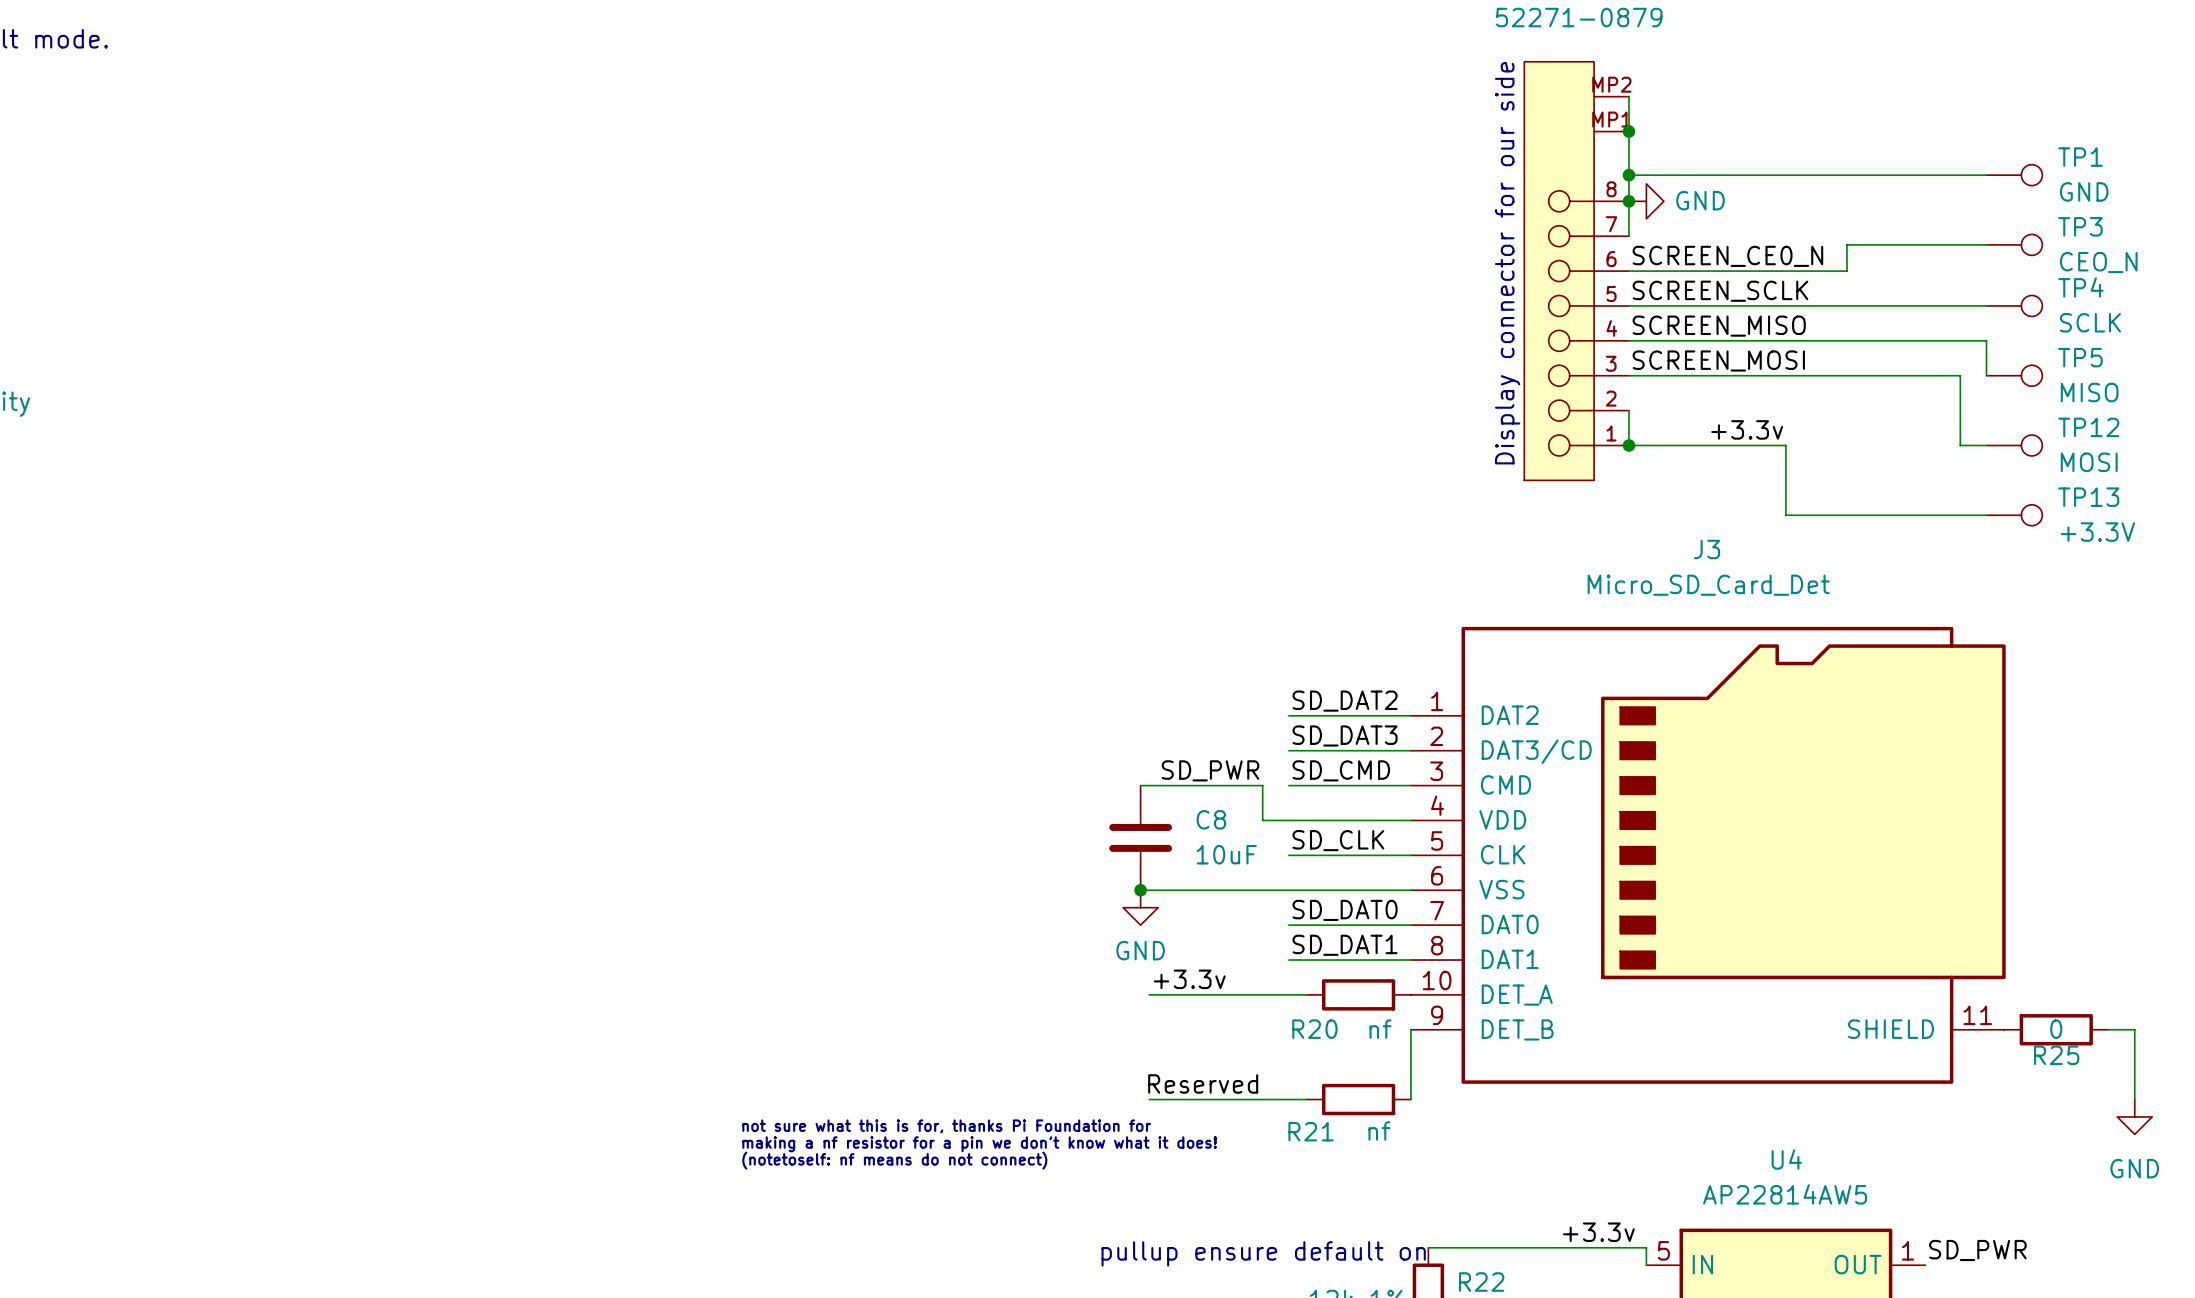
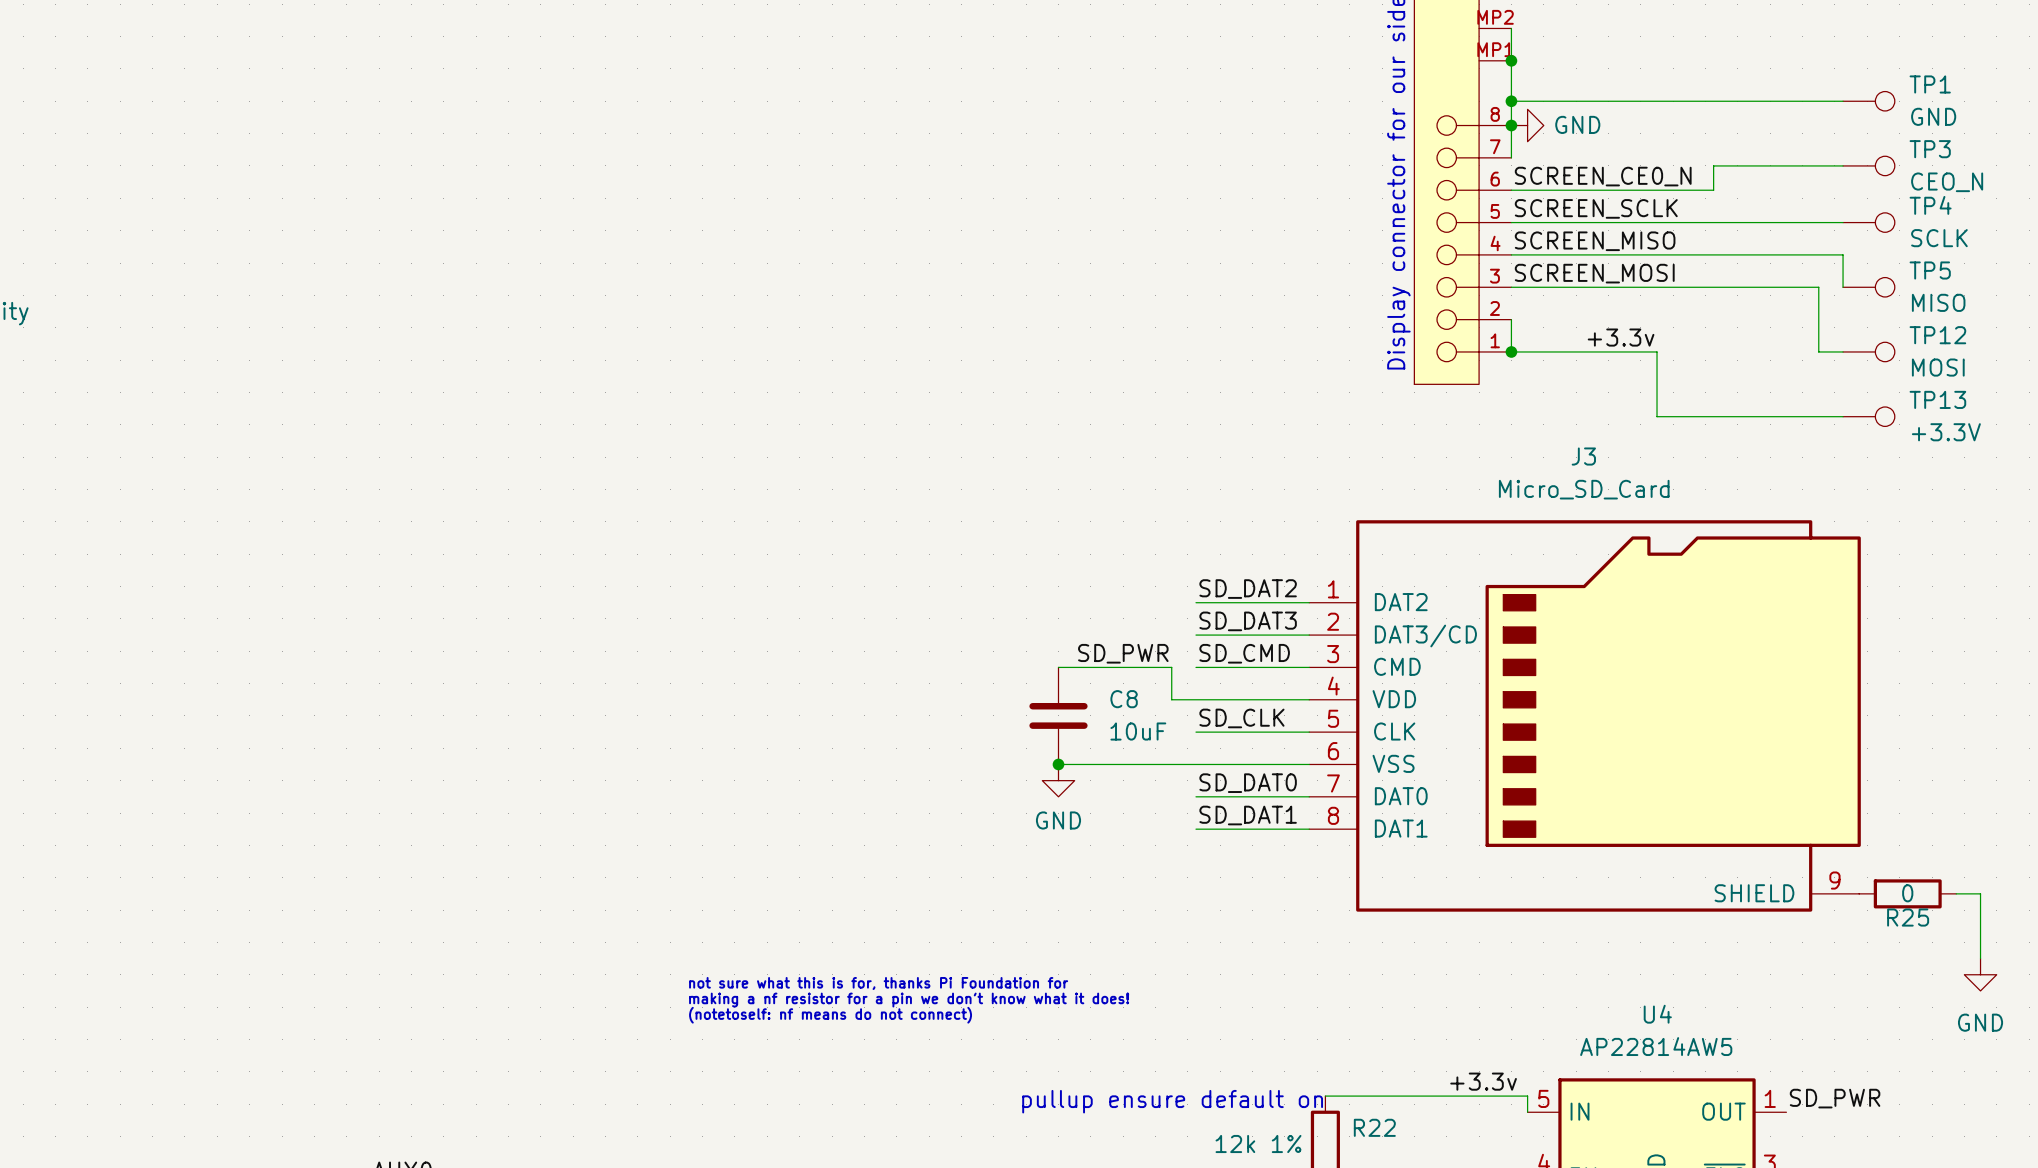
J3 value: Micro_SD_Card_Det (1708, 585) -> Micro_SD_Card (1584, 489)
J3 symbol: [1410, 626, 2006, 1084] -> [1309, 520, 1861, 912]
label: +3.3v (1189, 979) -> none
wire: (1149, 994) (1306, 994) -> none
R20: nf (1358, 994) -> none
wire: (1410, 1029) (1410, 1099) -> none
label: Reserved (1203, 1083) -> none
wire: (1149, 1099) (1306, 1099) -> none
R21: nf (1358, 1099) -> none

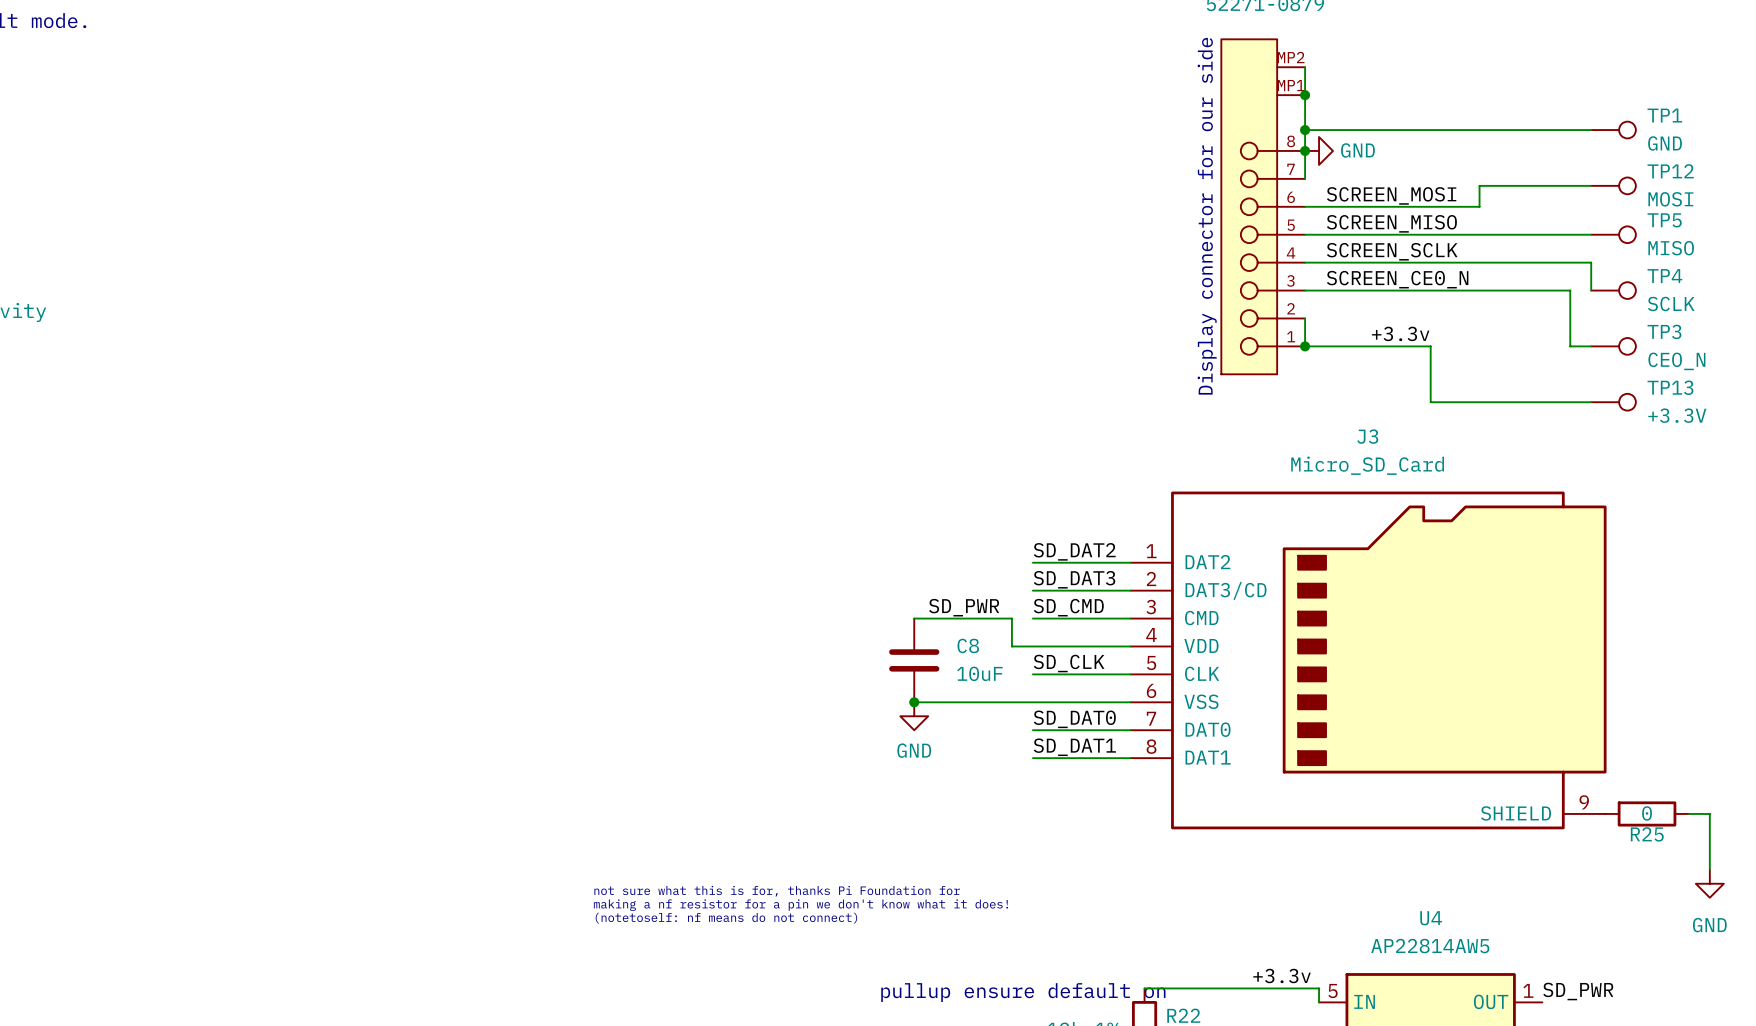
TP3 name: TP3 (1930, 149) -> TP12 (1670, 171)
label position: SCREEN_CE0_N (1603, 176) -> SCREEN_CE0_N (1397, 279)
TP3 value: CEO_N (1947, 182) -> MOSI (1670, 199)
TP4 name: TP4 (1930, 205) -> TP5 (1664, 220)
label position: SCREEN_SCLK (1596, 208) -> SCREEN_SCLK (1392, 251)
TP4 value: SCLK (1939, 238) -> MISO (1671, 248)
label position: SCREEN_MISO (1595, 241) -> SCREEN_MISO (1391, 223)
TP5 name: TP5 (1930, 270) -> TP4 (1664, 276)
label position: SCREEN_MOSI (1594, 273) -> SCREEN_MOSI (1391, 195)
TP5 value: MISO (1938, 302) -> SCLK (1671, 303)
TP12 name: TP12 (1937, 335) -> TP3 (1664, 331)
TP12 value: MOSI (1938, 367) -> CEO_N (1676, 361)

